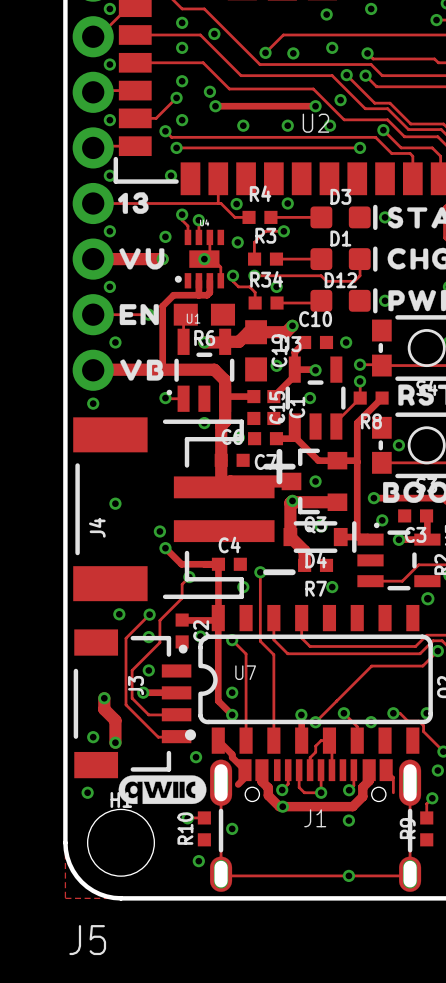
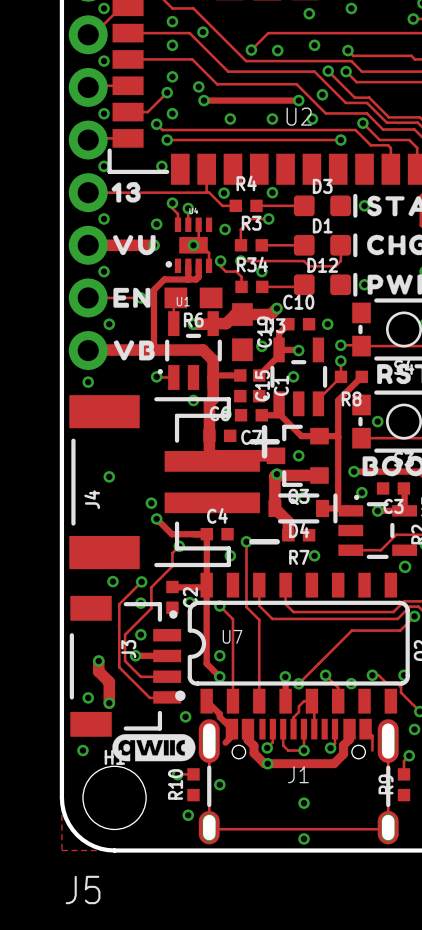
via: (348, 820) -> none
via: none -> (304, 803)
via: (348, 875) -> none
via: none -> (304, 838)

